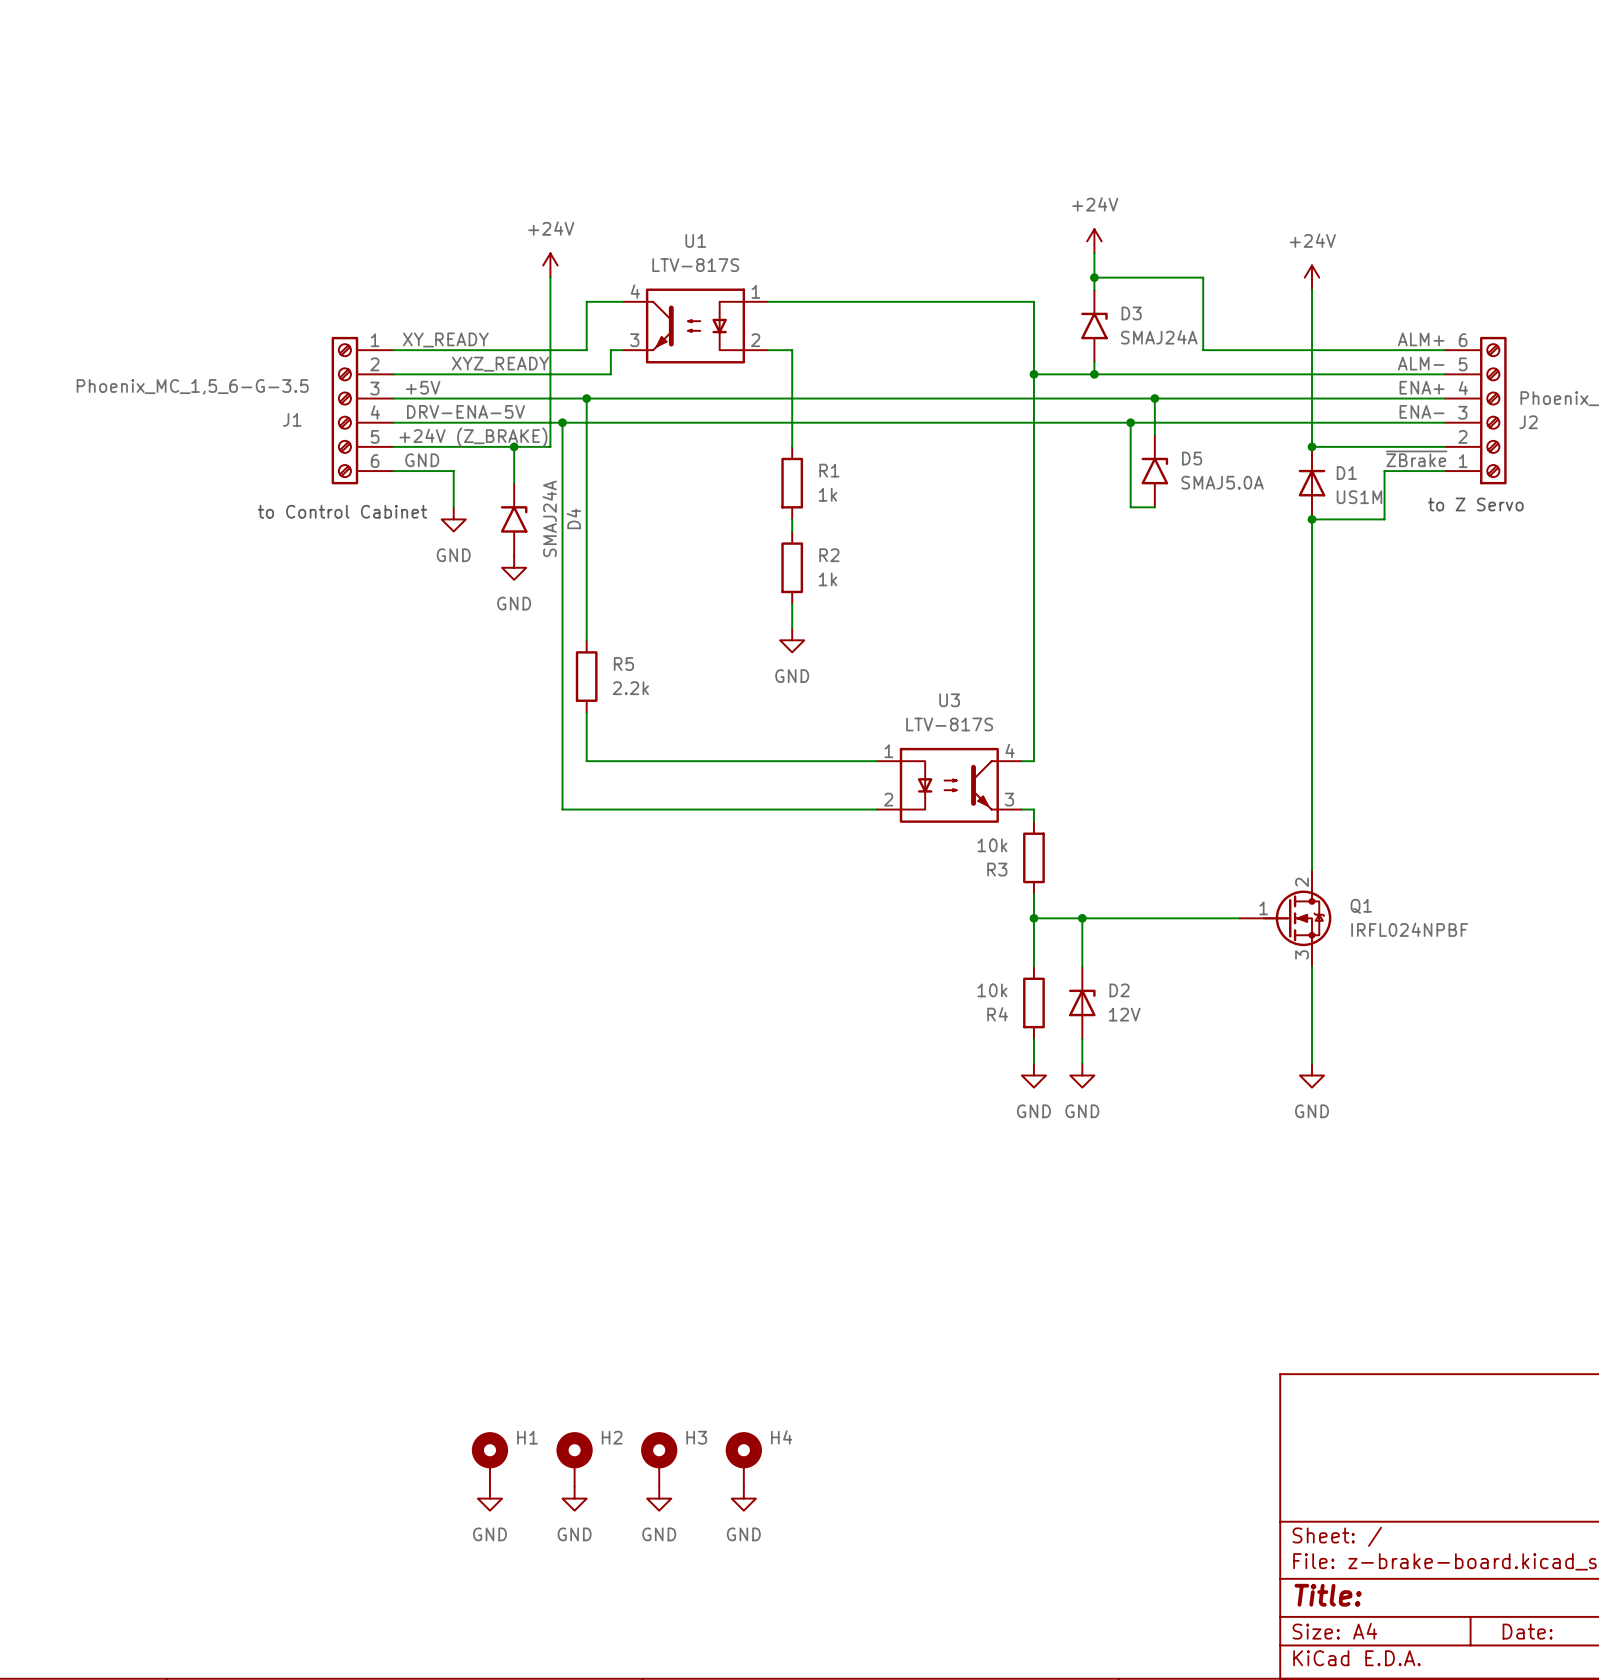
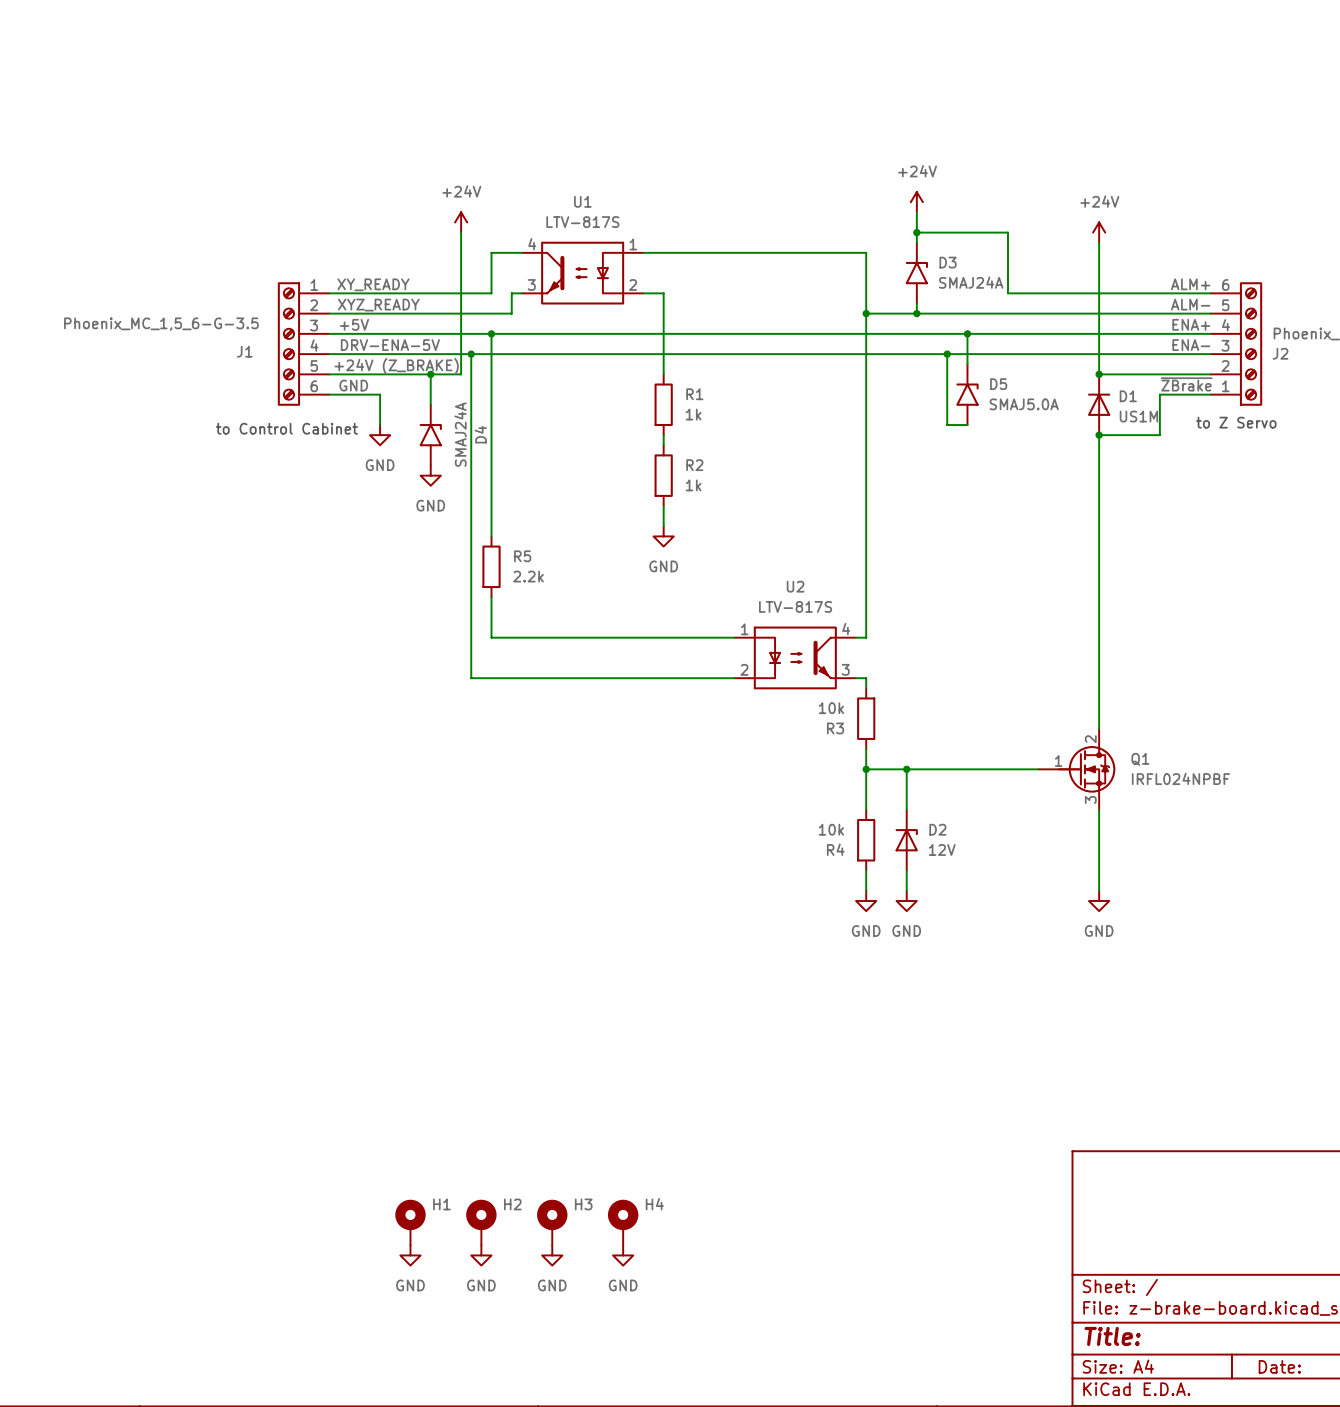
label position: XYZ_READY (500, 364) -> XYZ_READY (378, 305)
U3 name: U3 (949, 700) -> U2 (795, 586)

